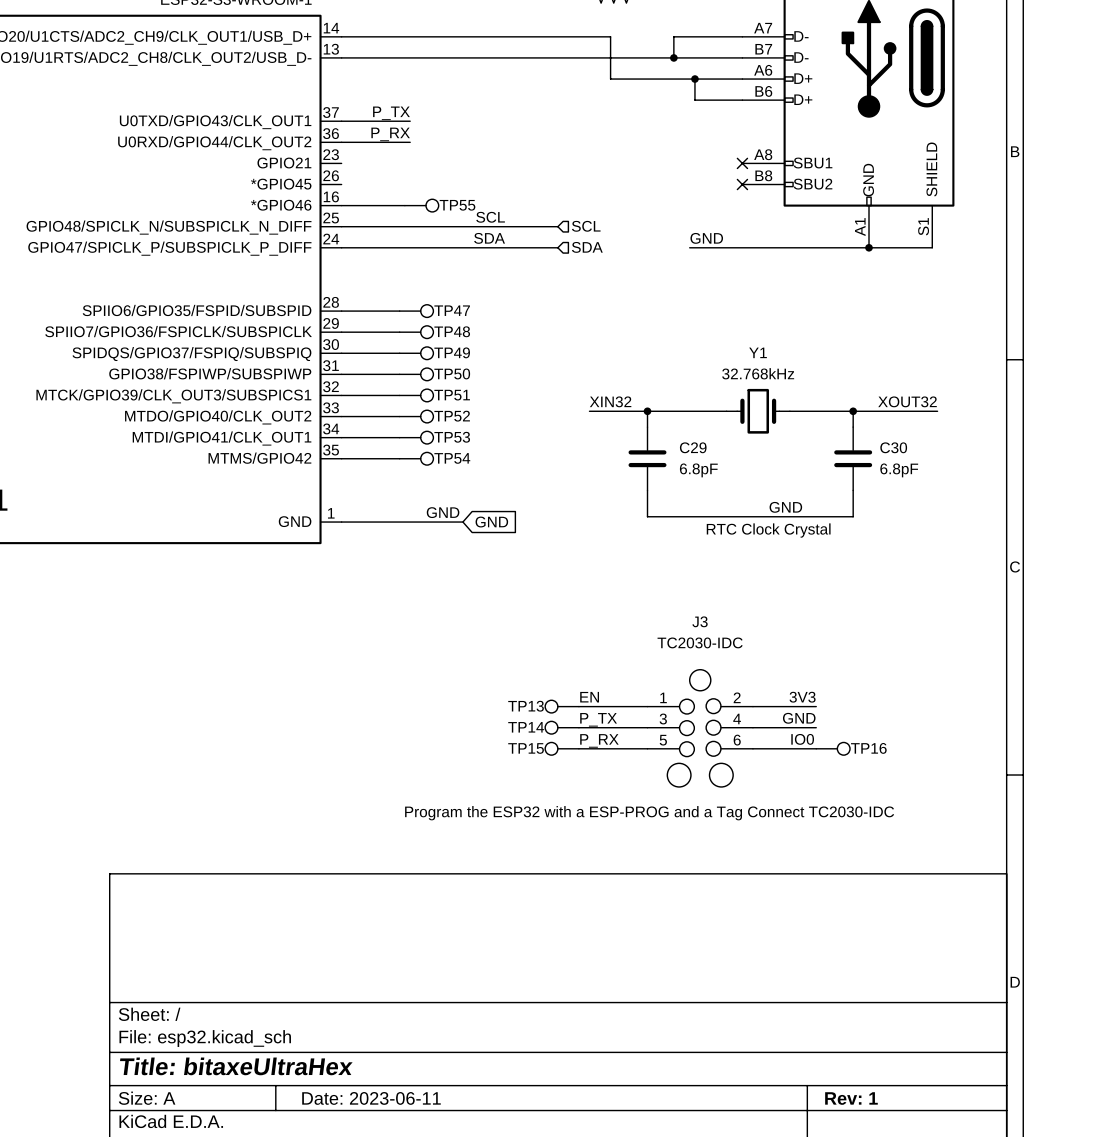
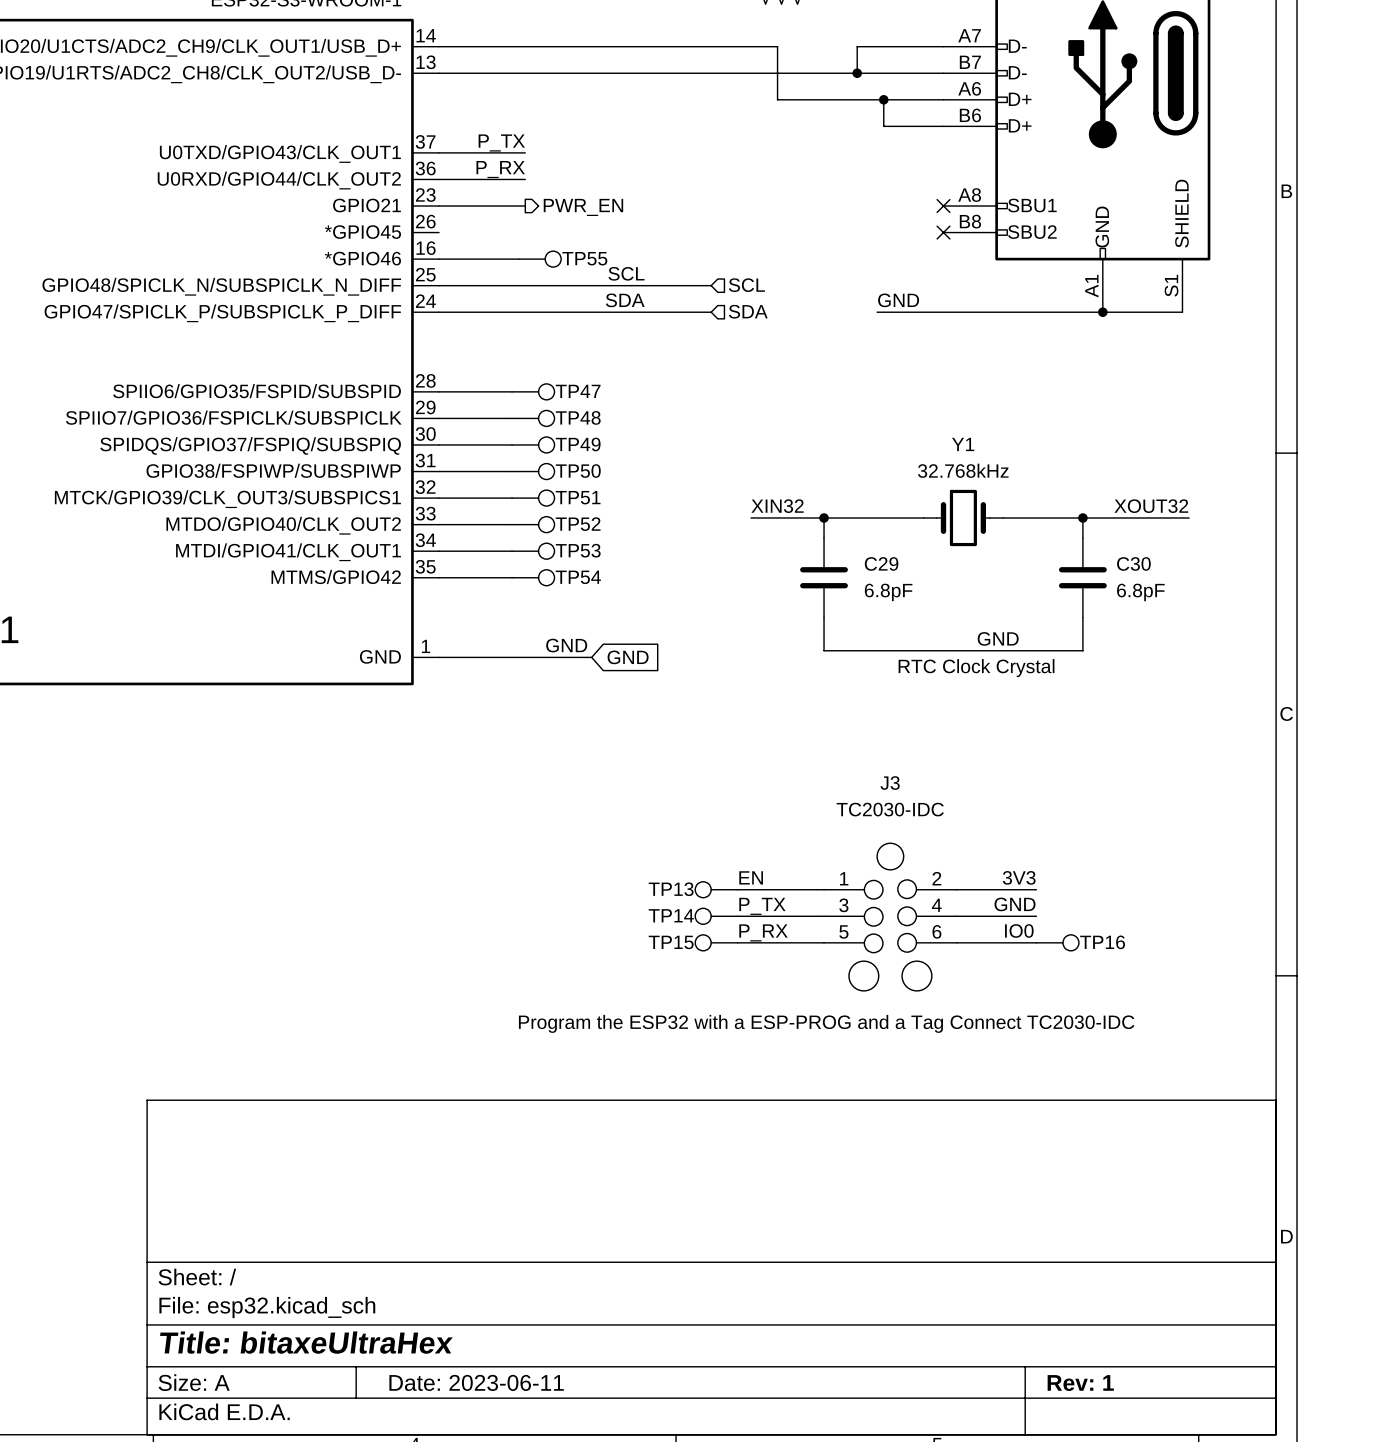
wire: none -> (439, 206) (525, 206)
hierarchical label: none -> PWR_EN (583, 207)

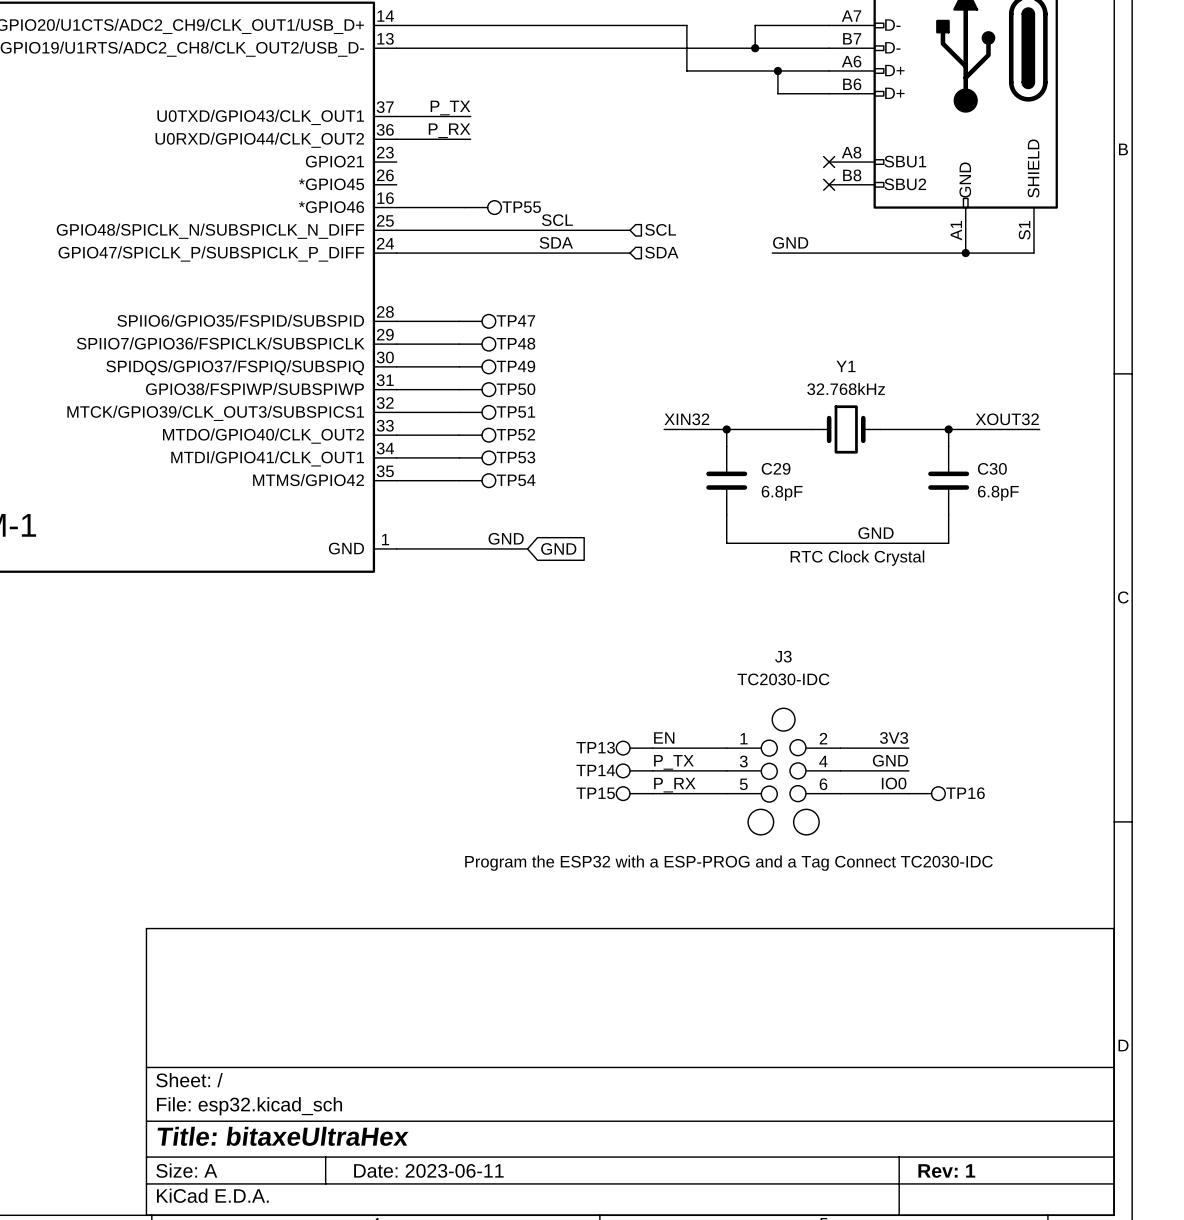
wire: (439, 206) (525, 206) -> none
hierarchical label: PWR_EN (583, 207) -> none

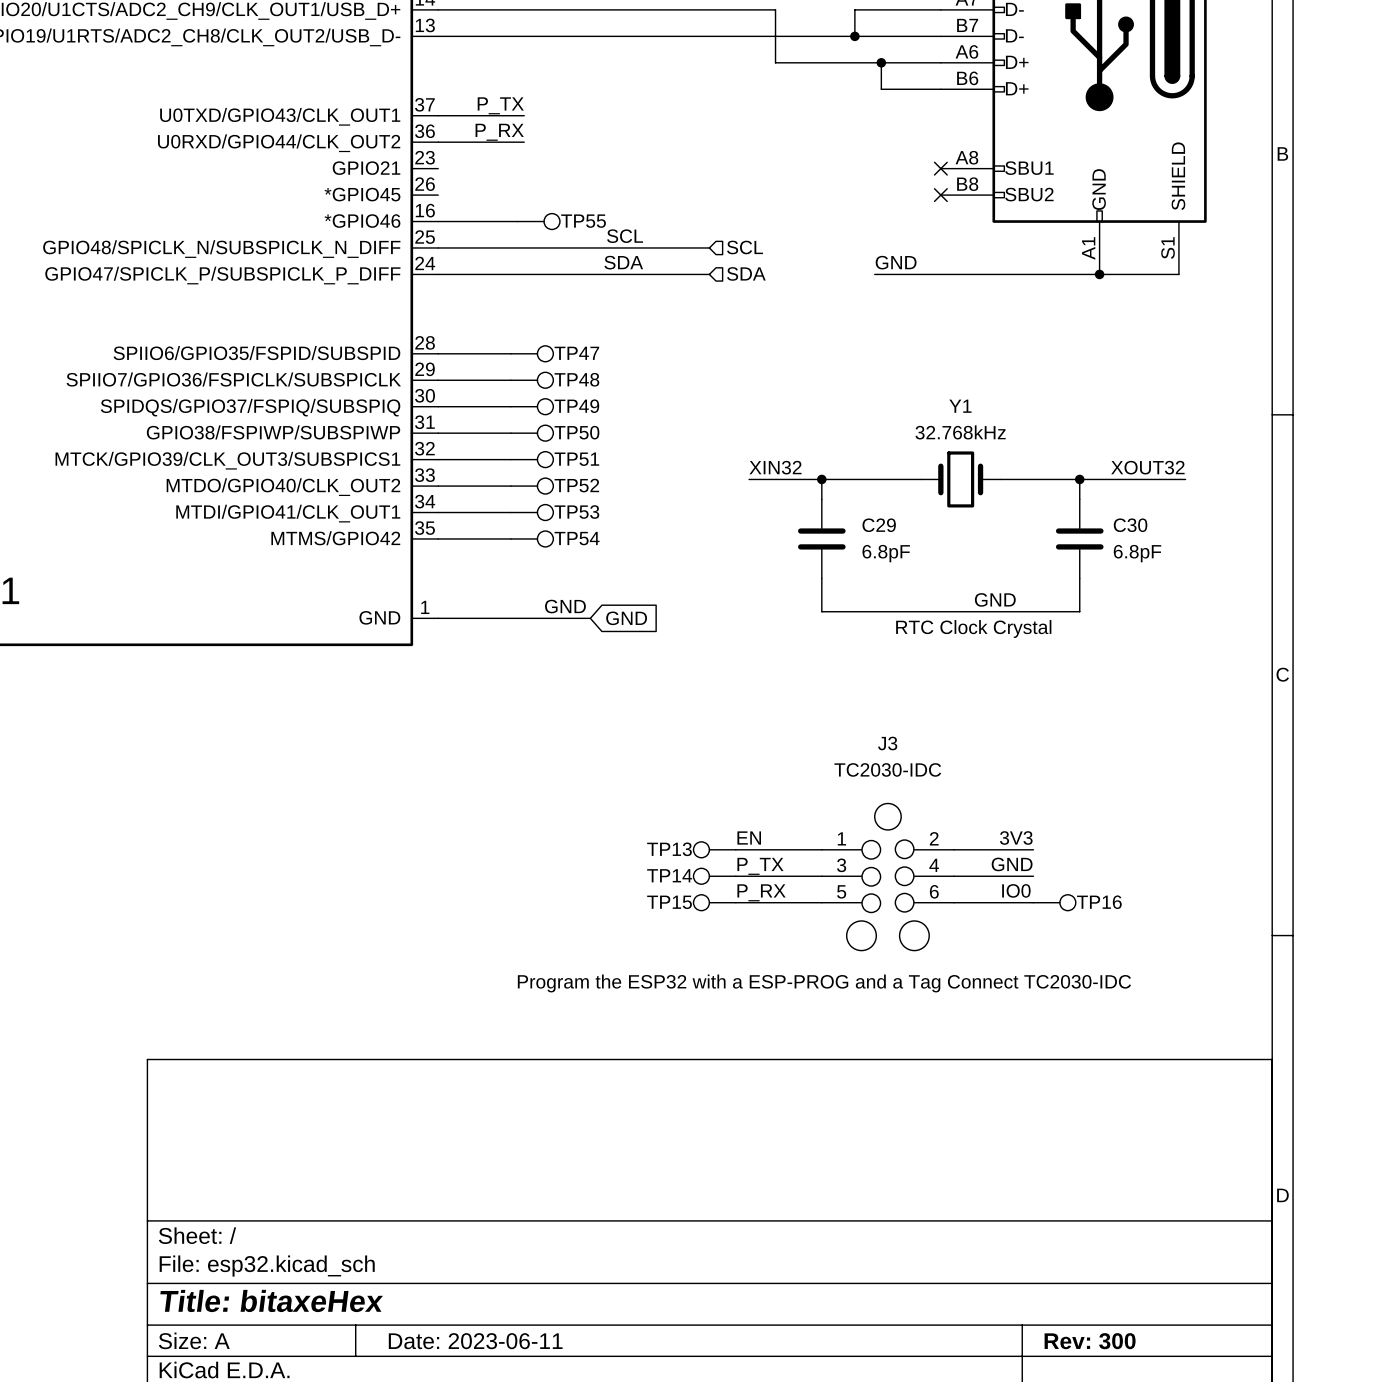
title block: Title: bitaxeUltraHex (283, 1136) -> Title: bitaxeHex (271, 1300)
title block: Rev: 1 (946, 1171) -> Rev: 300 (1090, 1341)

